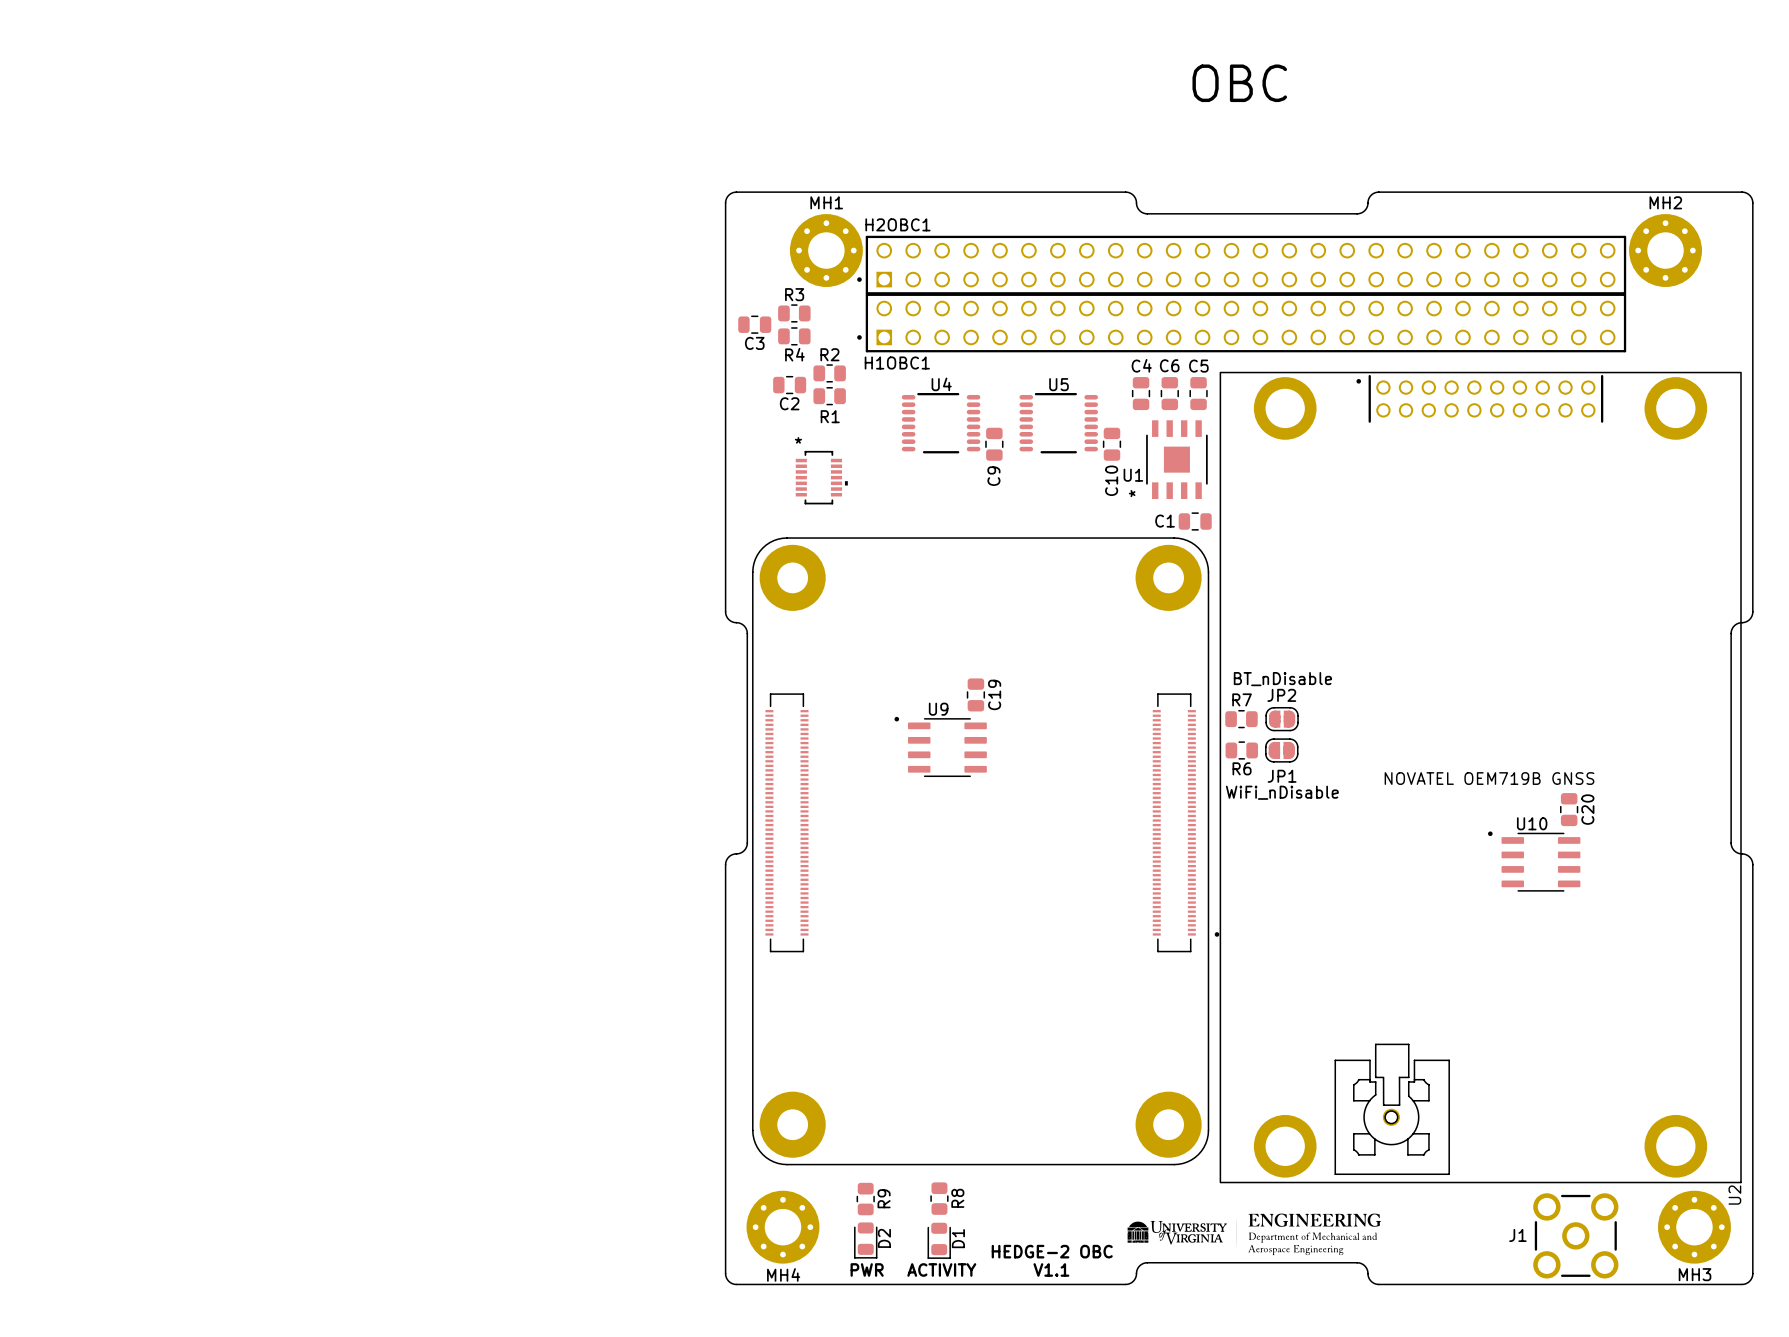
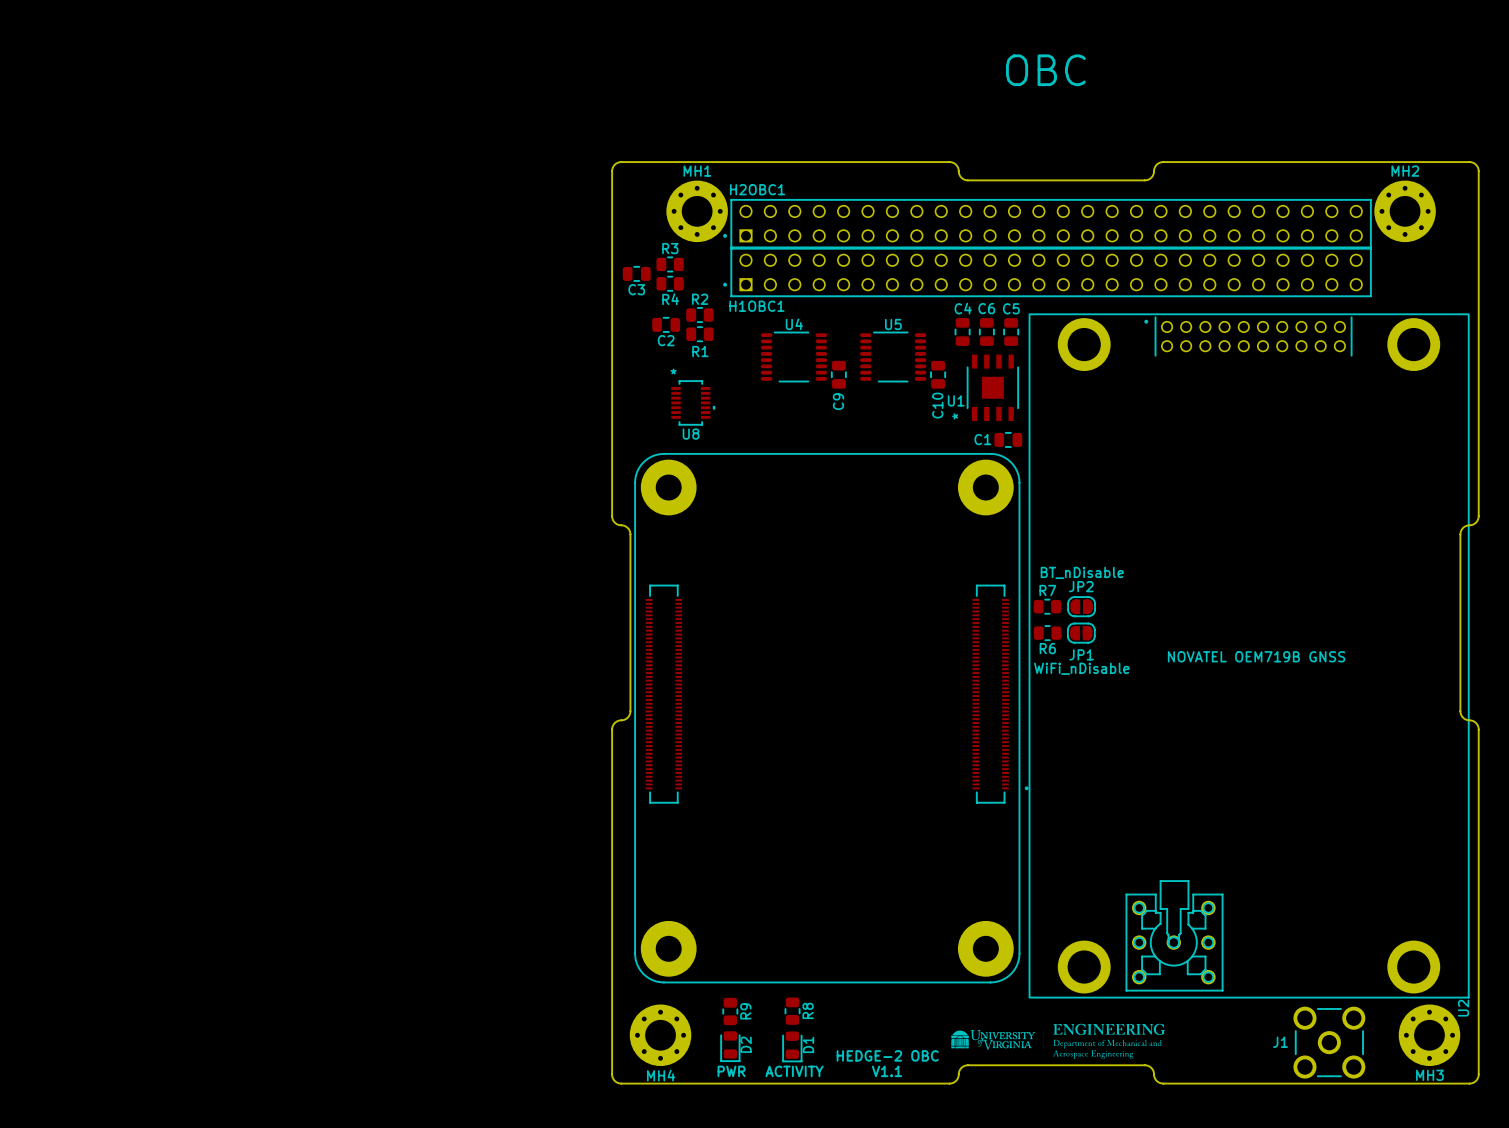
U2 footprint: [1219, 371, 1742, 1184] -> [1029, 313, 1470, 999]
U8 name: none -> U8 (691, 434)
C19: (975, 694) -> none
U9: (940, 746) -> none
C20: (1569, 809) -> none
U10: (1534, 861) -> none

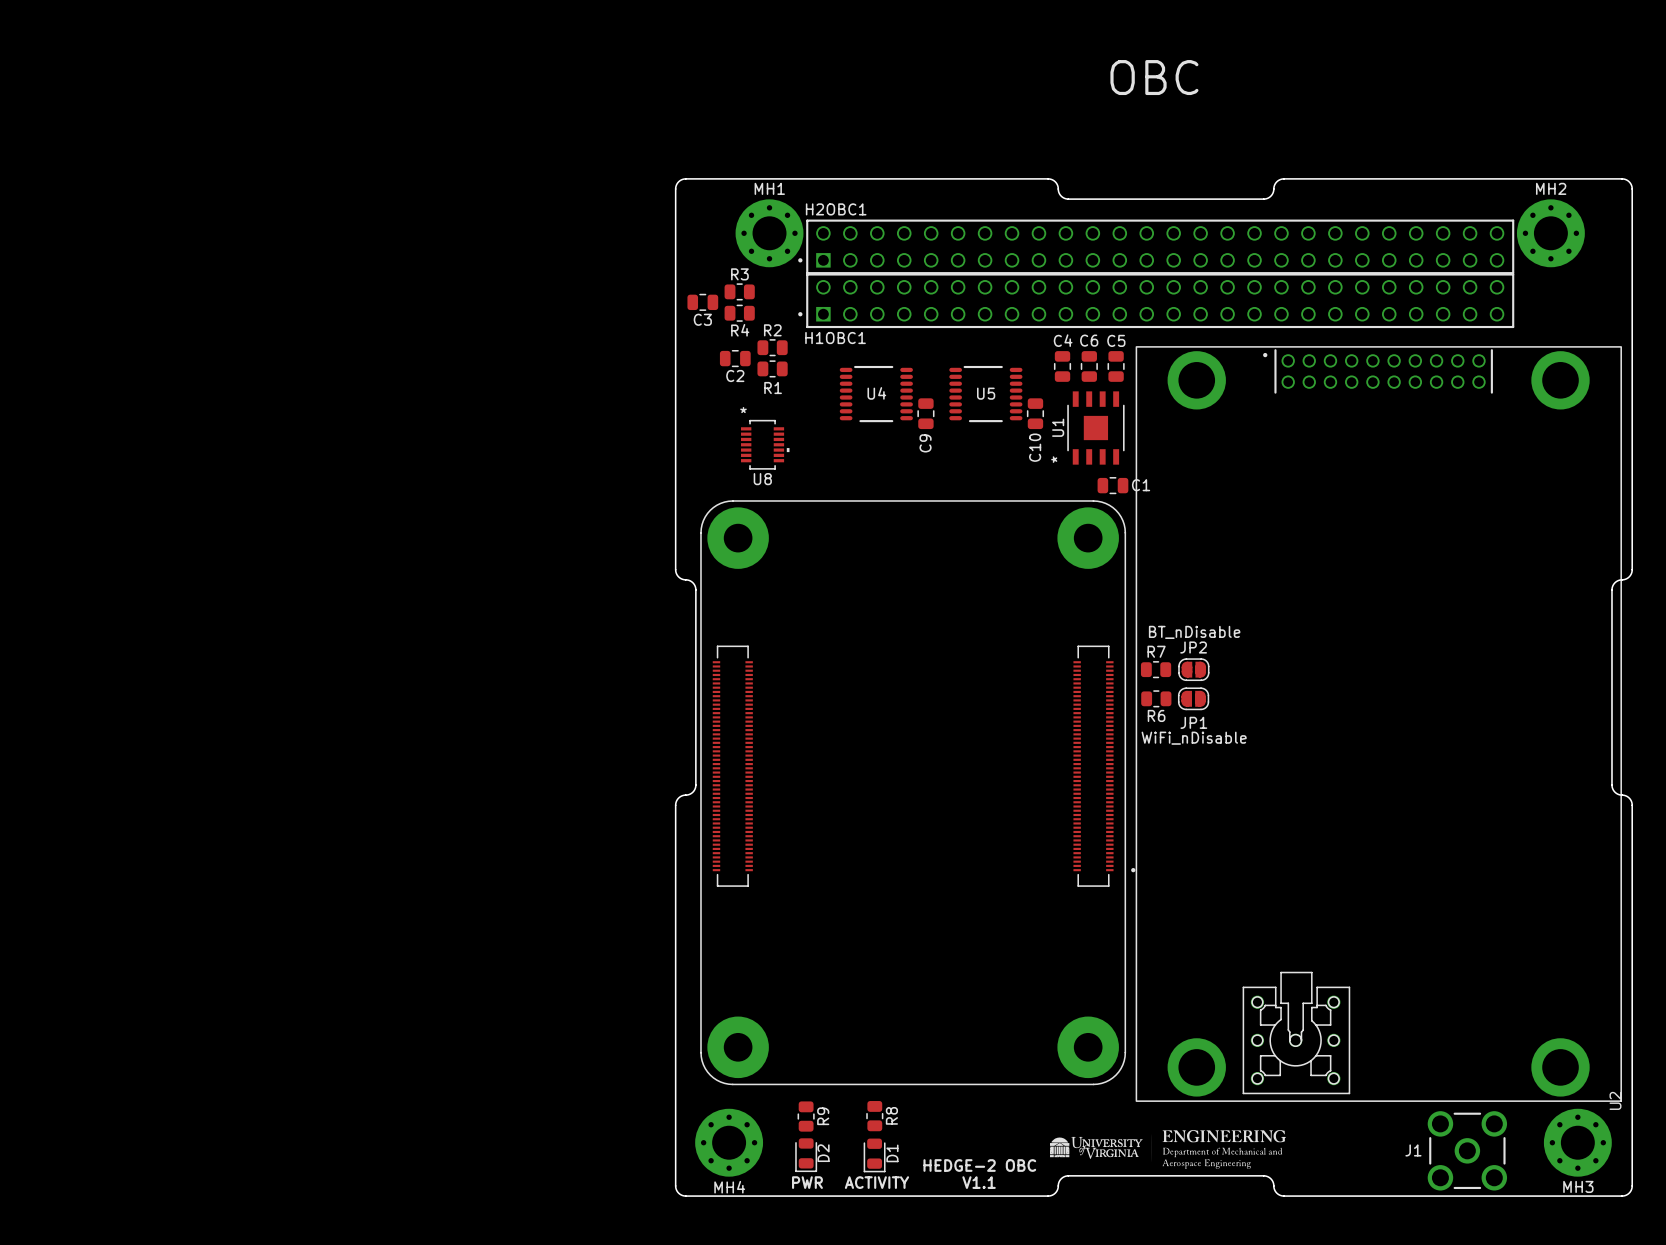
U2 footprint: [1029, 313, 1470, 999] -> [1135, 346, 1622, 1102]
U4 name position: U4 (794, 324) -> U4 (876, 393)
U5 name position: U5 (893, 324) -> U5 (986, 393)
U1 name rotation: 0° (956, 400) -> 90° counterclockwise (1058, 427)
C1 name position: C1 (982, 439) -> C1 (1141, 485)

